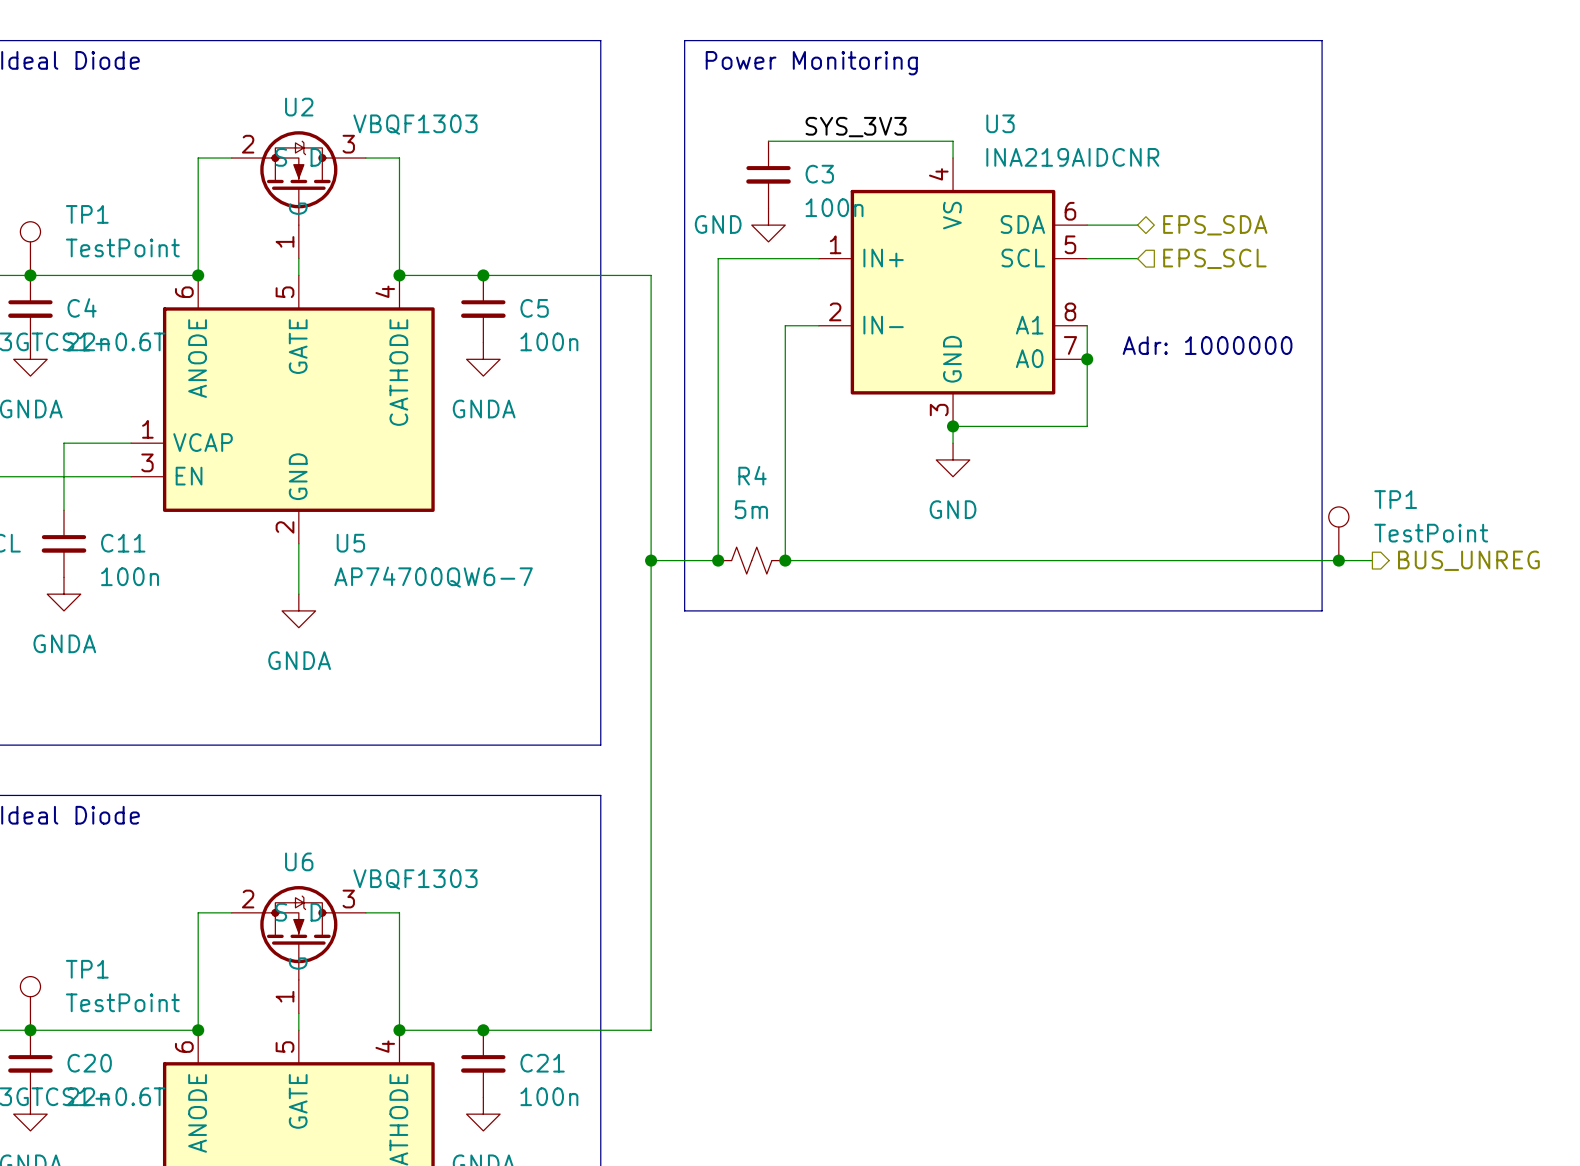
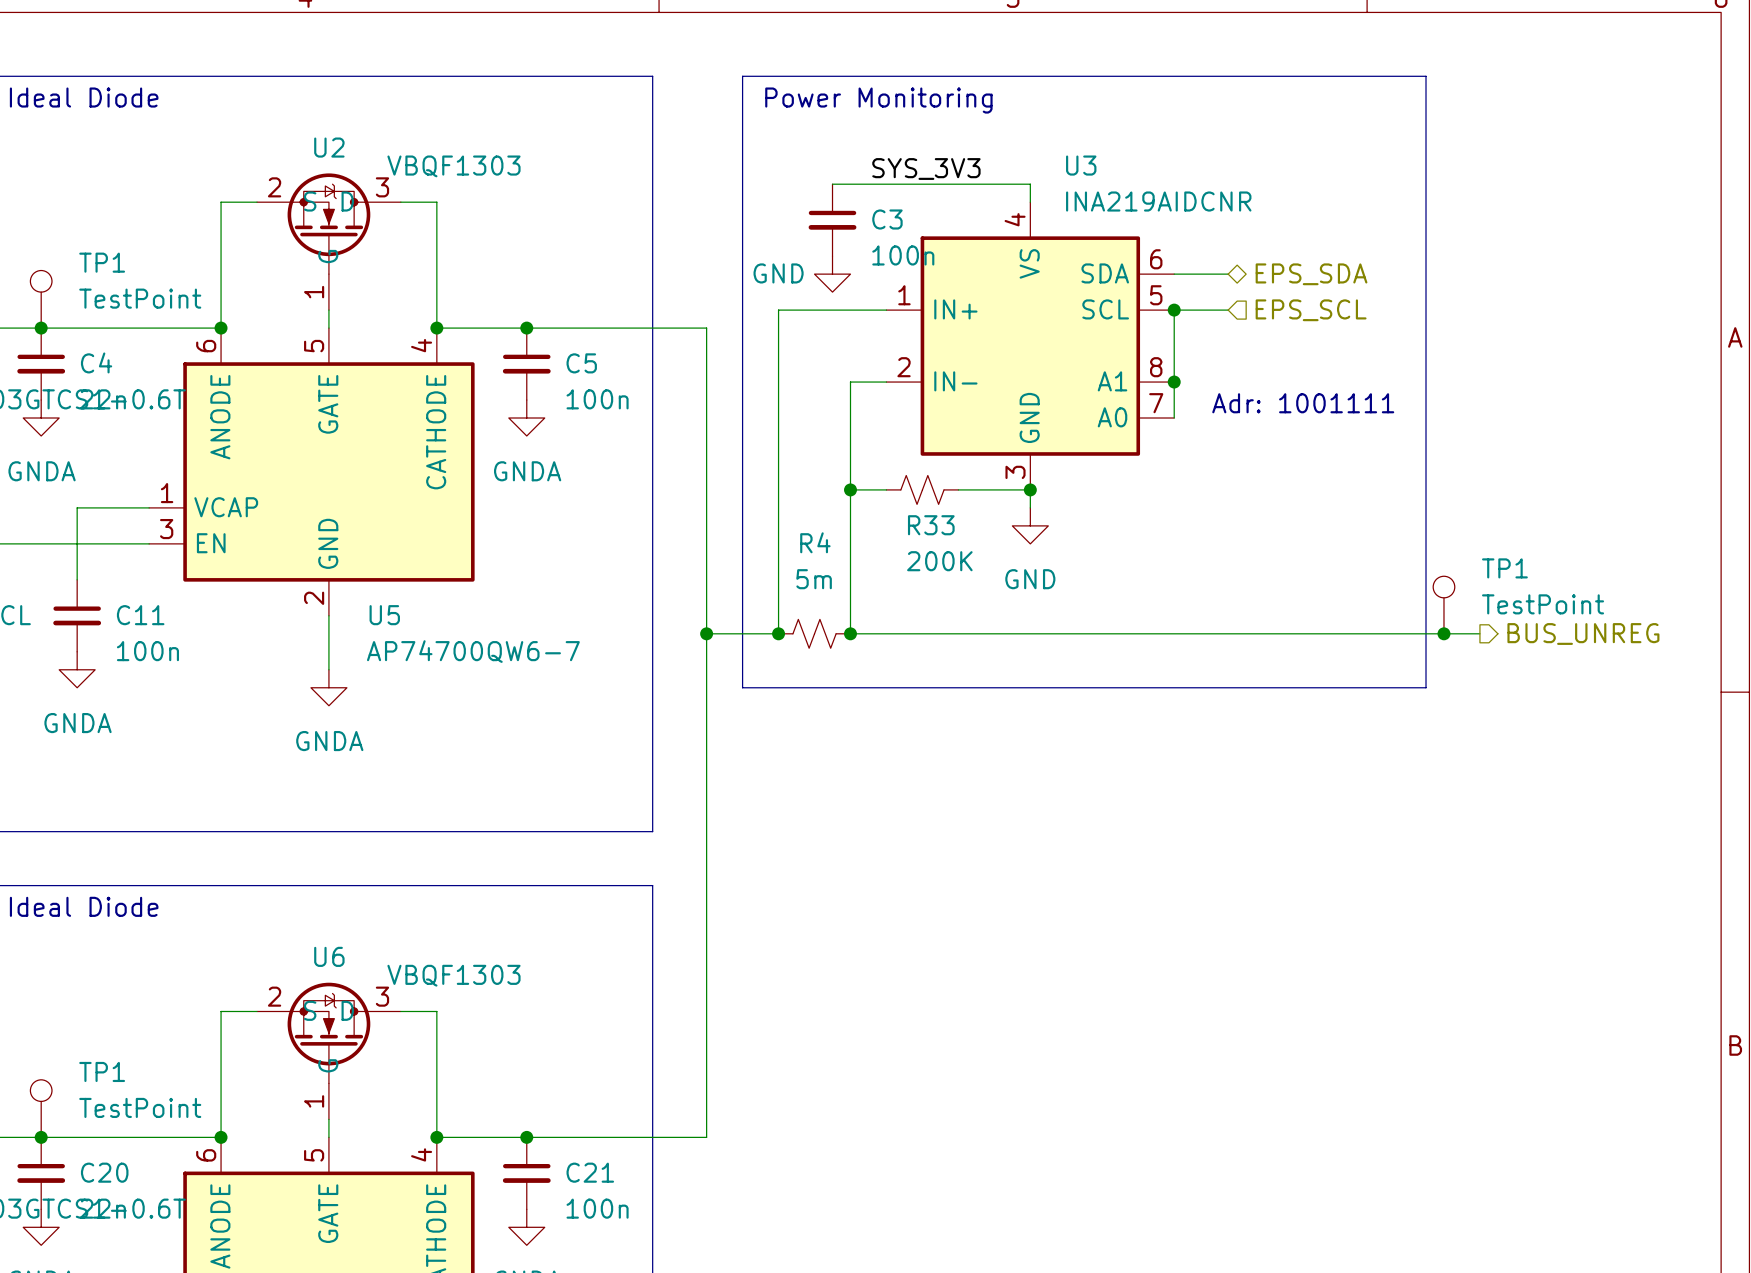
wire: none -> (1174, 310) (1174, 382)
junction: none -> (1174, 310)
text: Adr: 1000000 (1207, 345) -> Adr: 1001111 (1303, 403)
wire: (1087, 359) (1087, 426) (953, 426) -> (958, 489) (1030, 489)
junction position: (1087, 359) -> (1174, 382)
wire: none -> (850, 489) (886, 489)
junction: none -> (850, 489)
R33: none -> 200K (922, 489)

